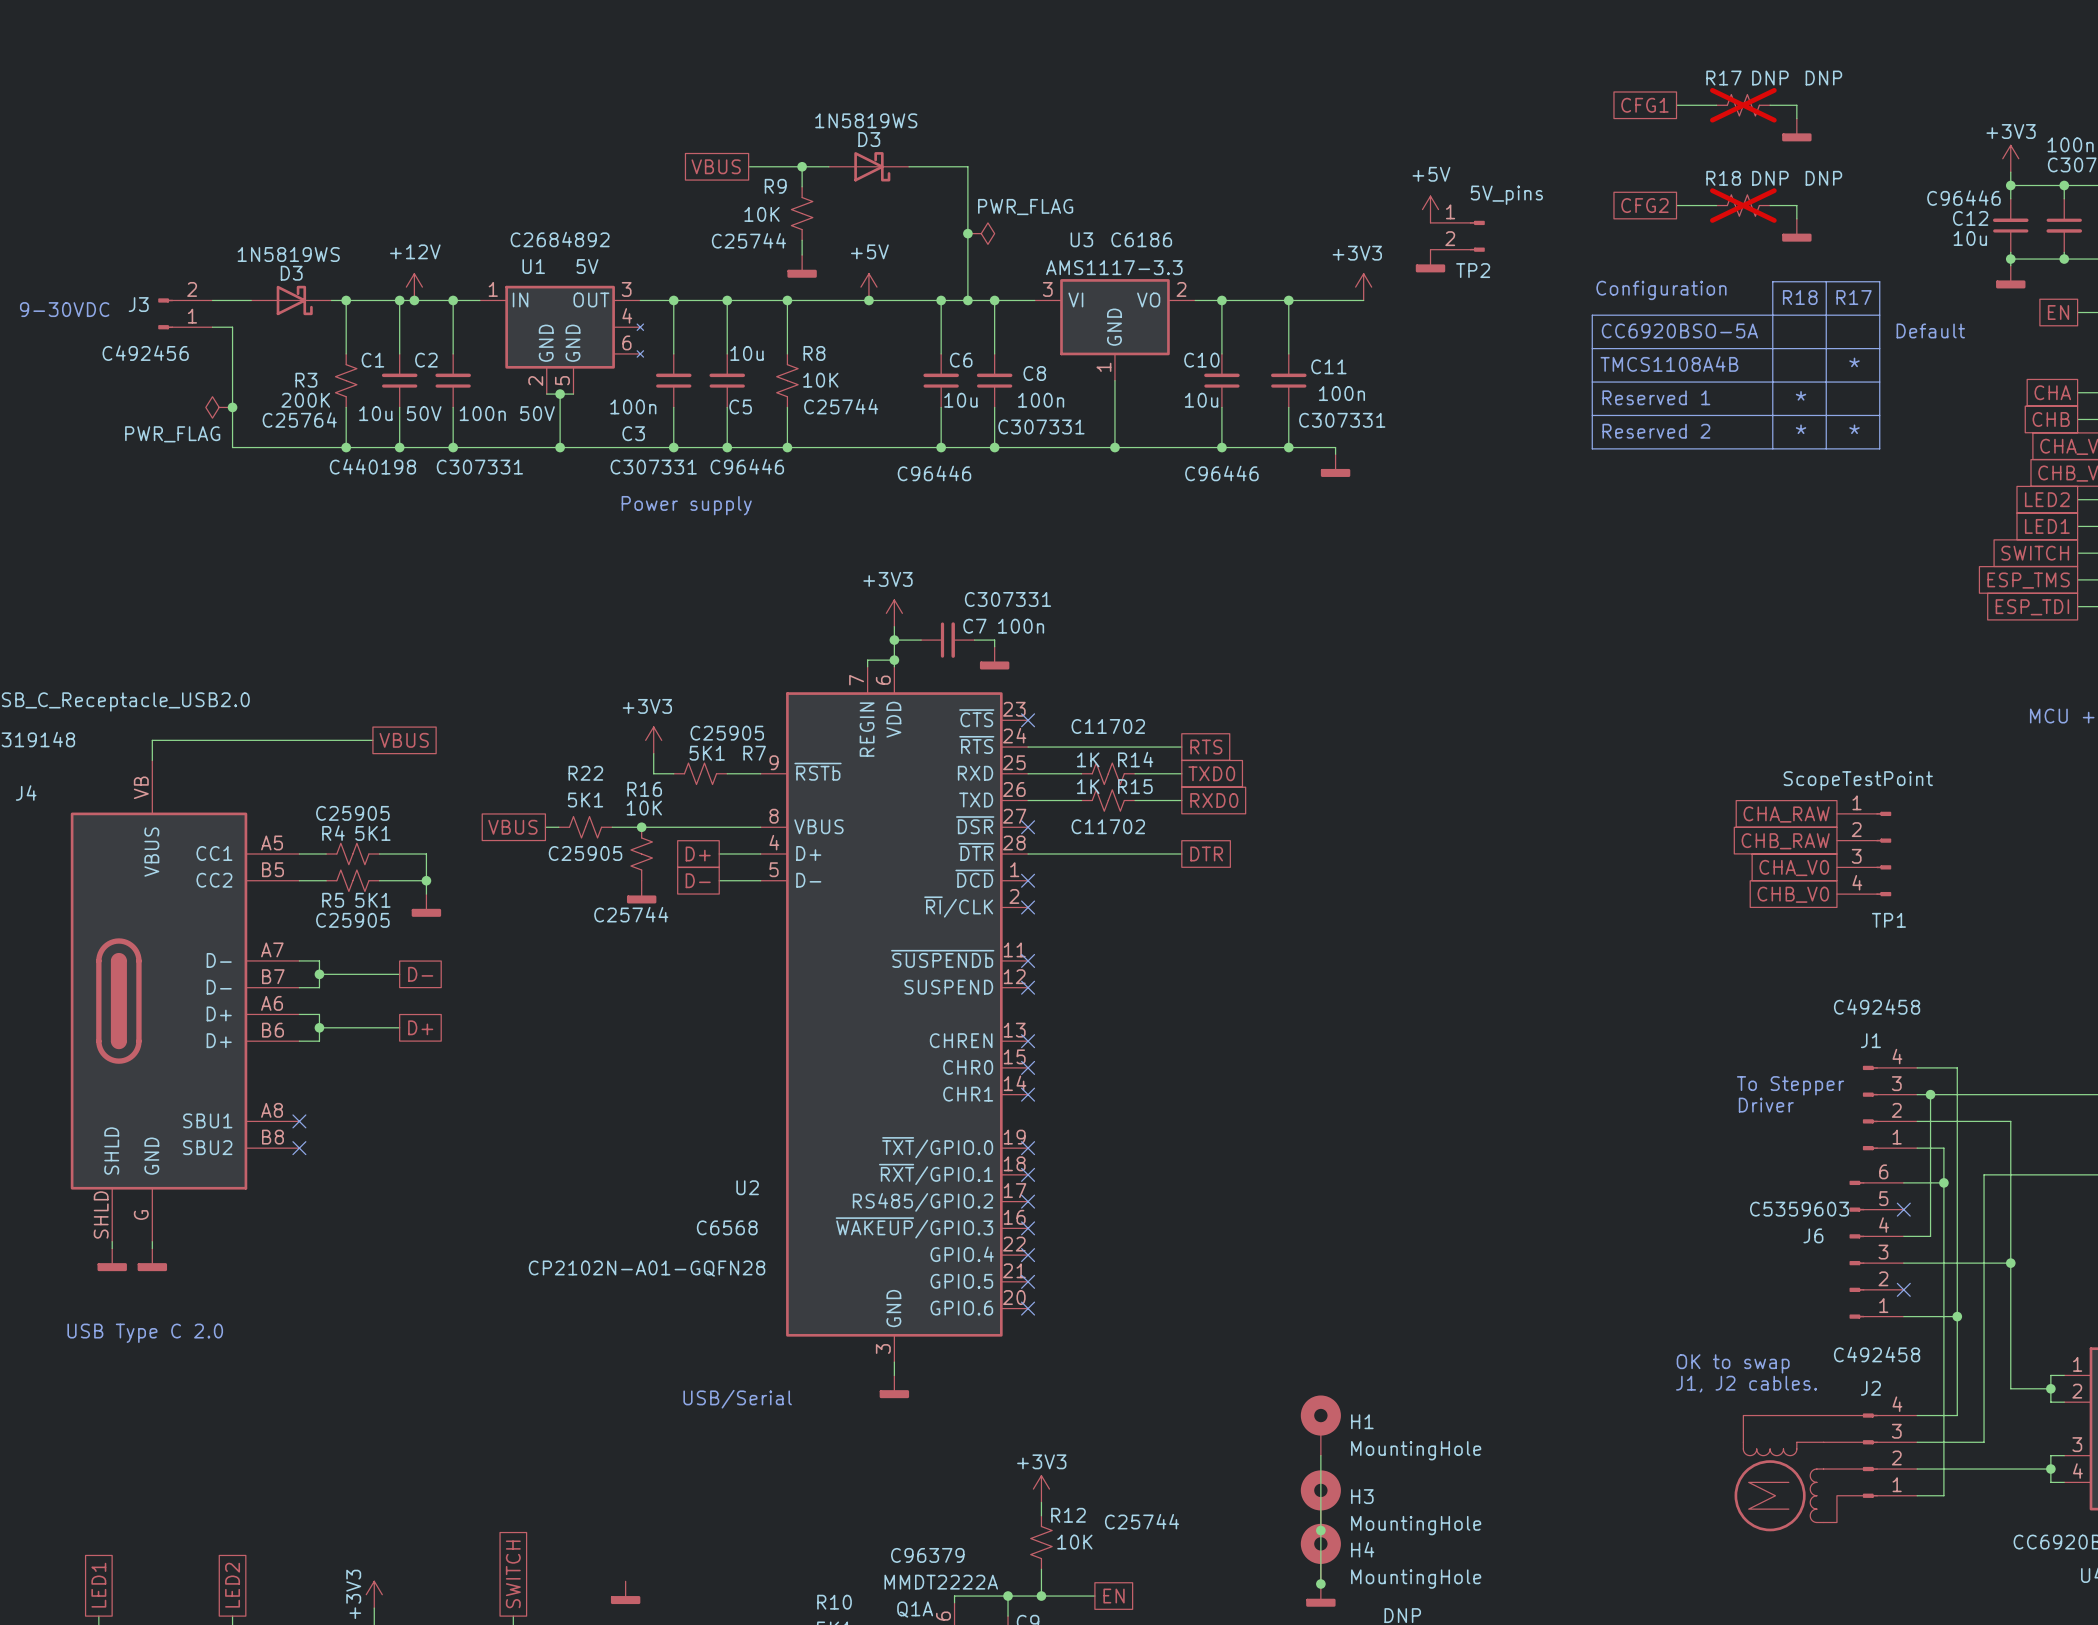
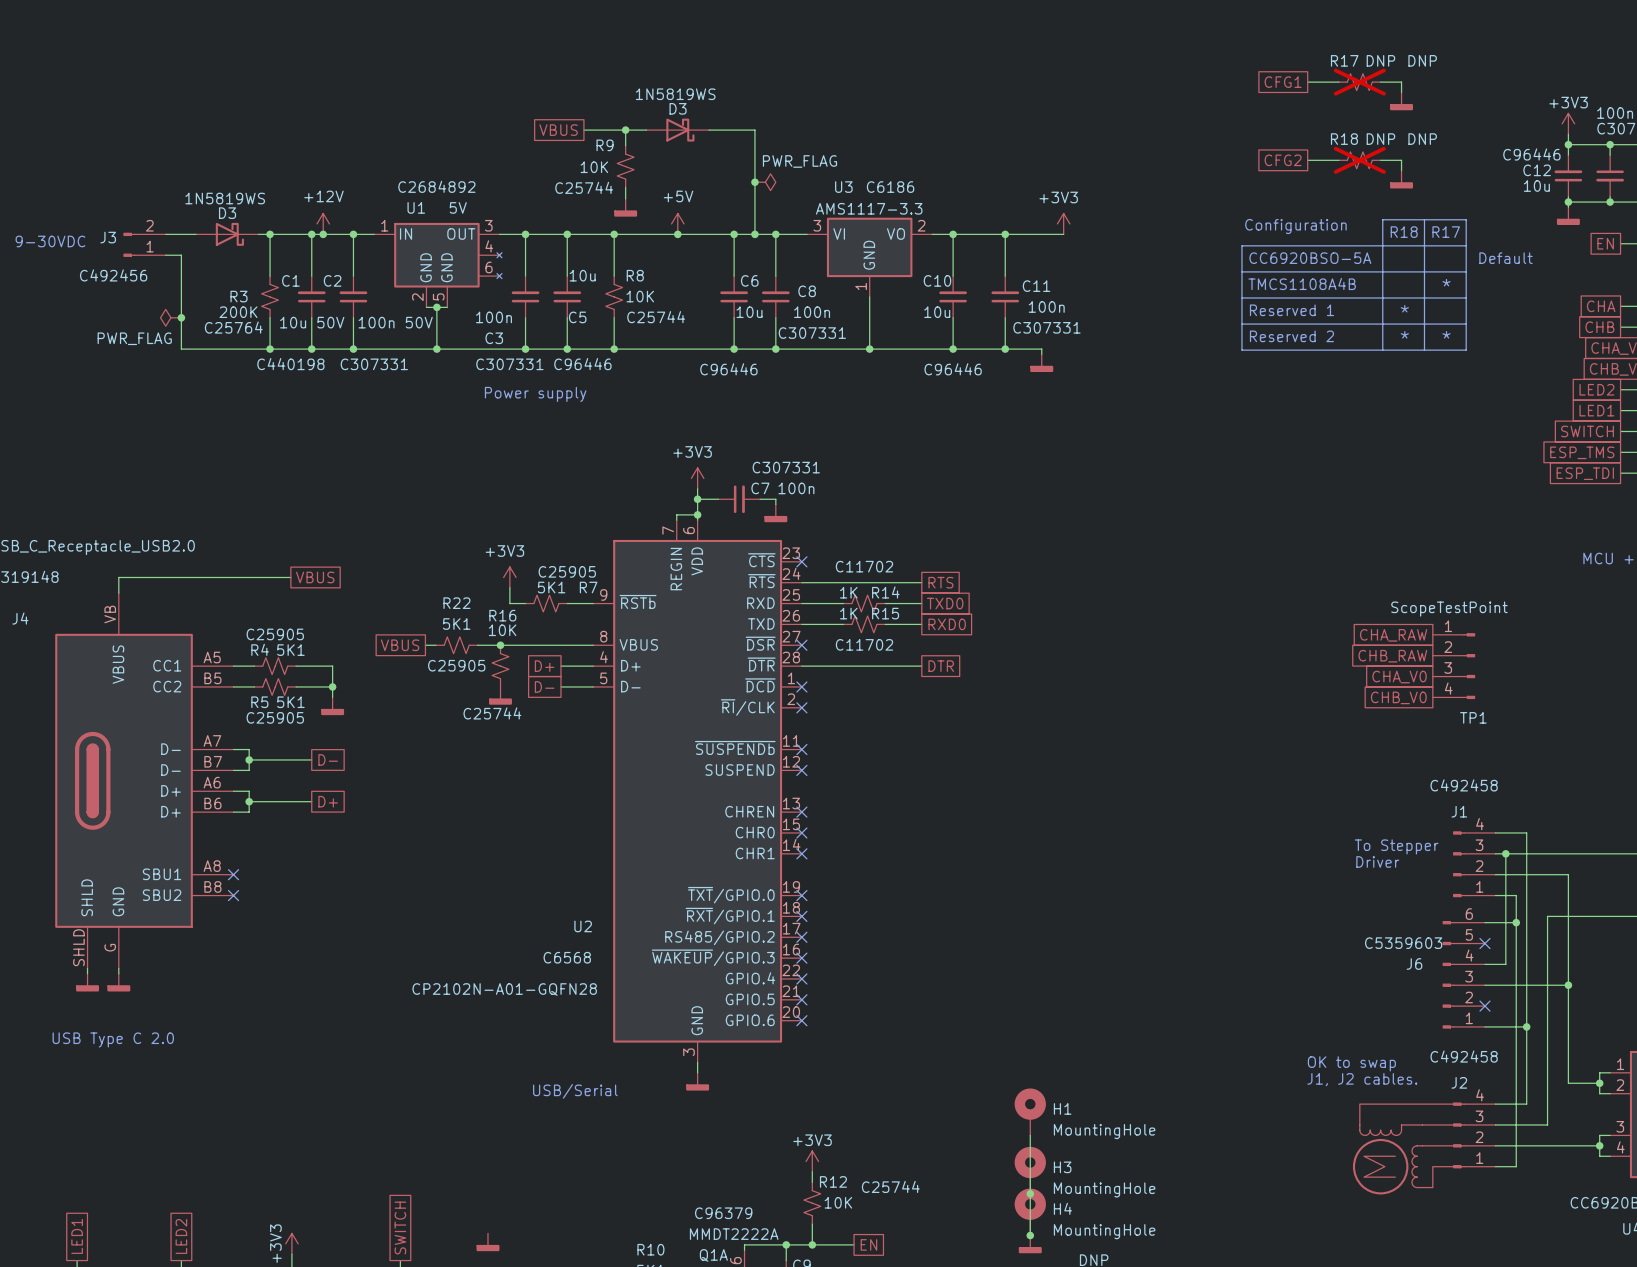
power symbol: +5V (1430, 209) -> none
TP2: 5V_pins (1457, 236) -> none
power symbol: (1430, 261) -> none

